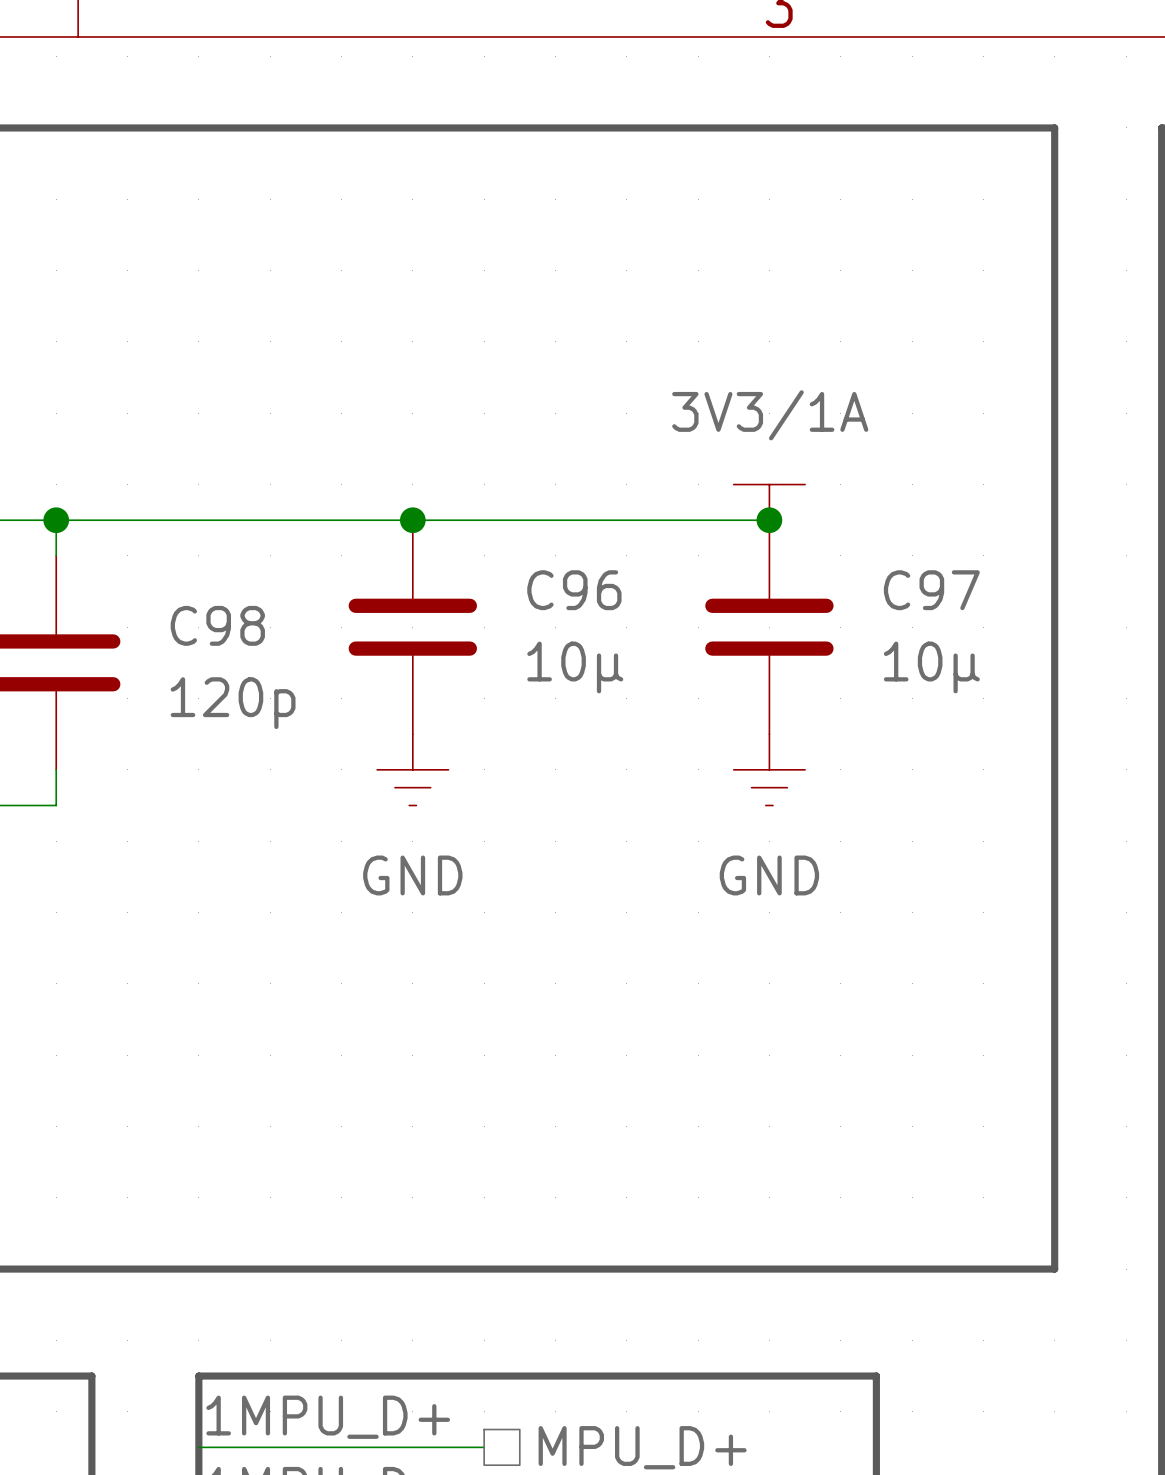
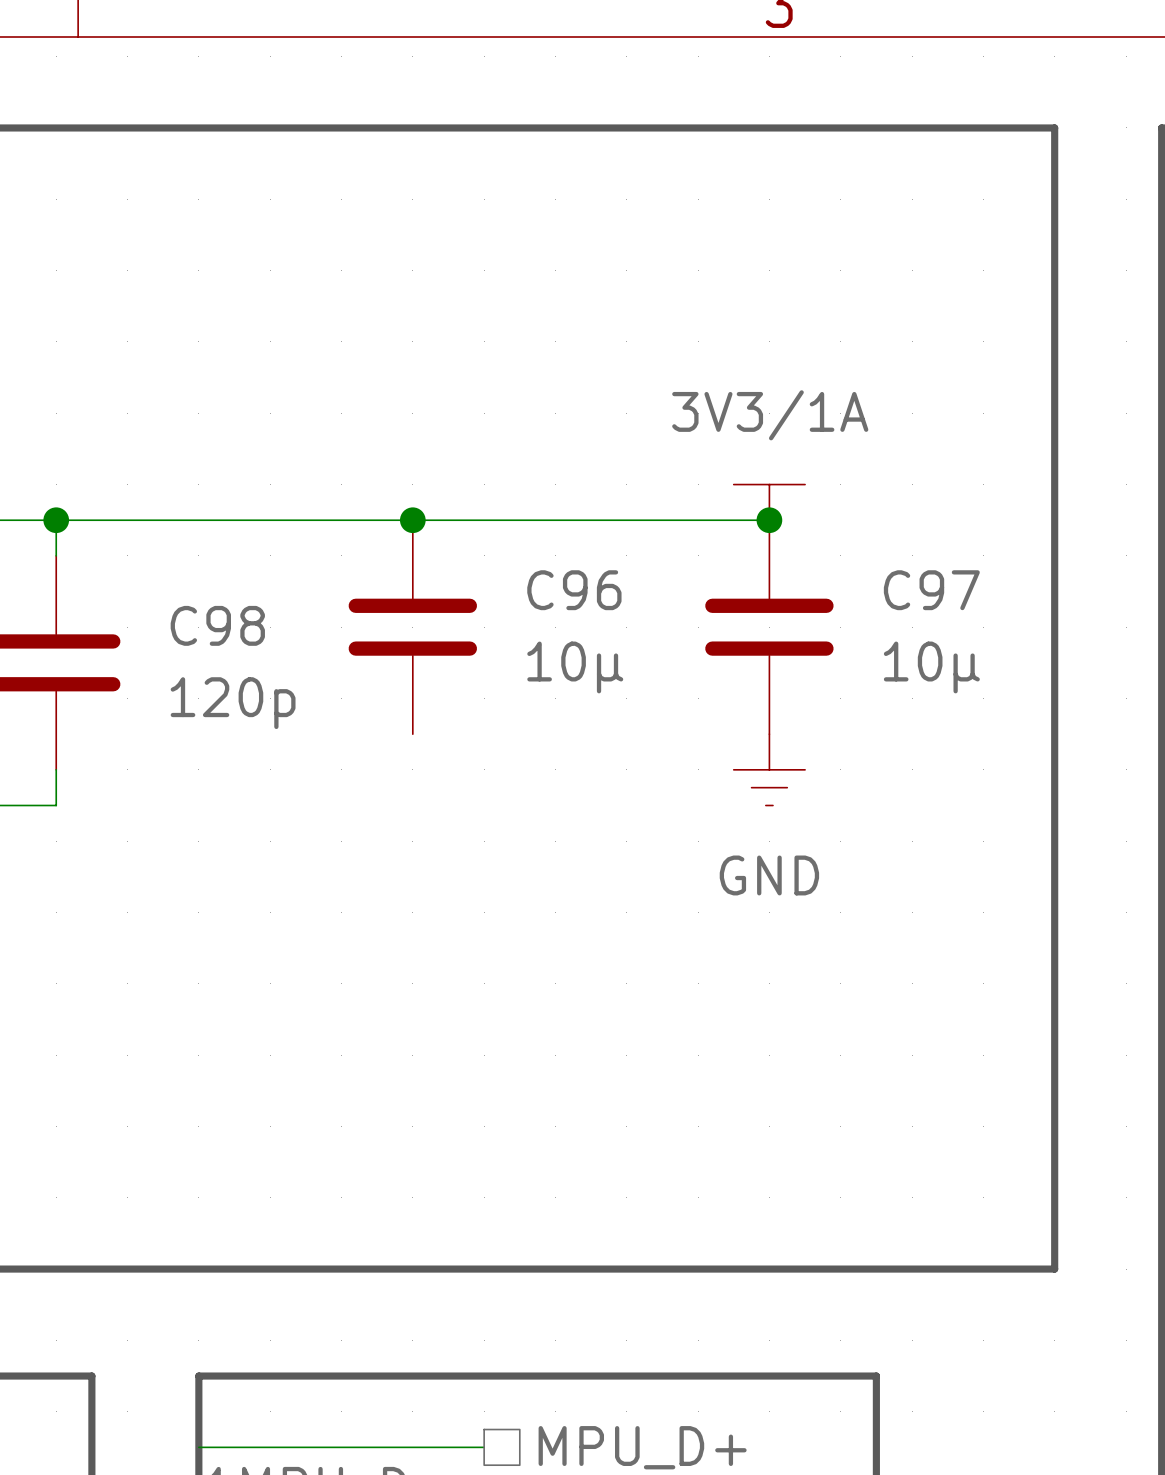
power symbol: GND (412, 769) -> none
label: 1MPU_D+ (328, 1417) -> none

